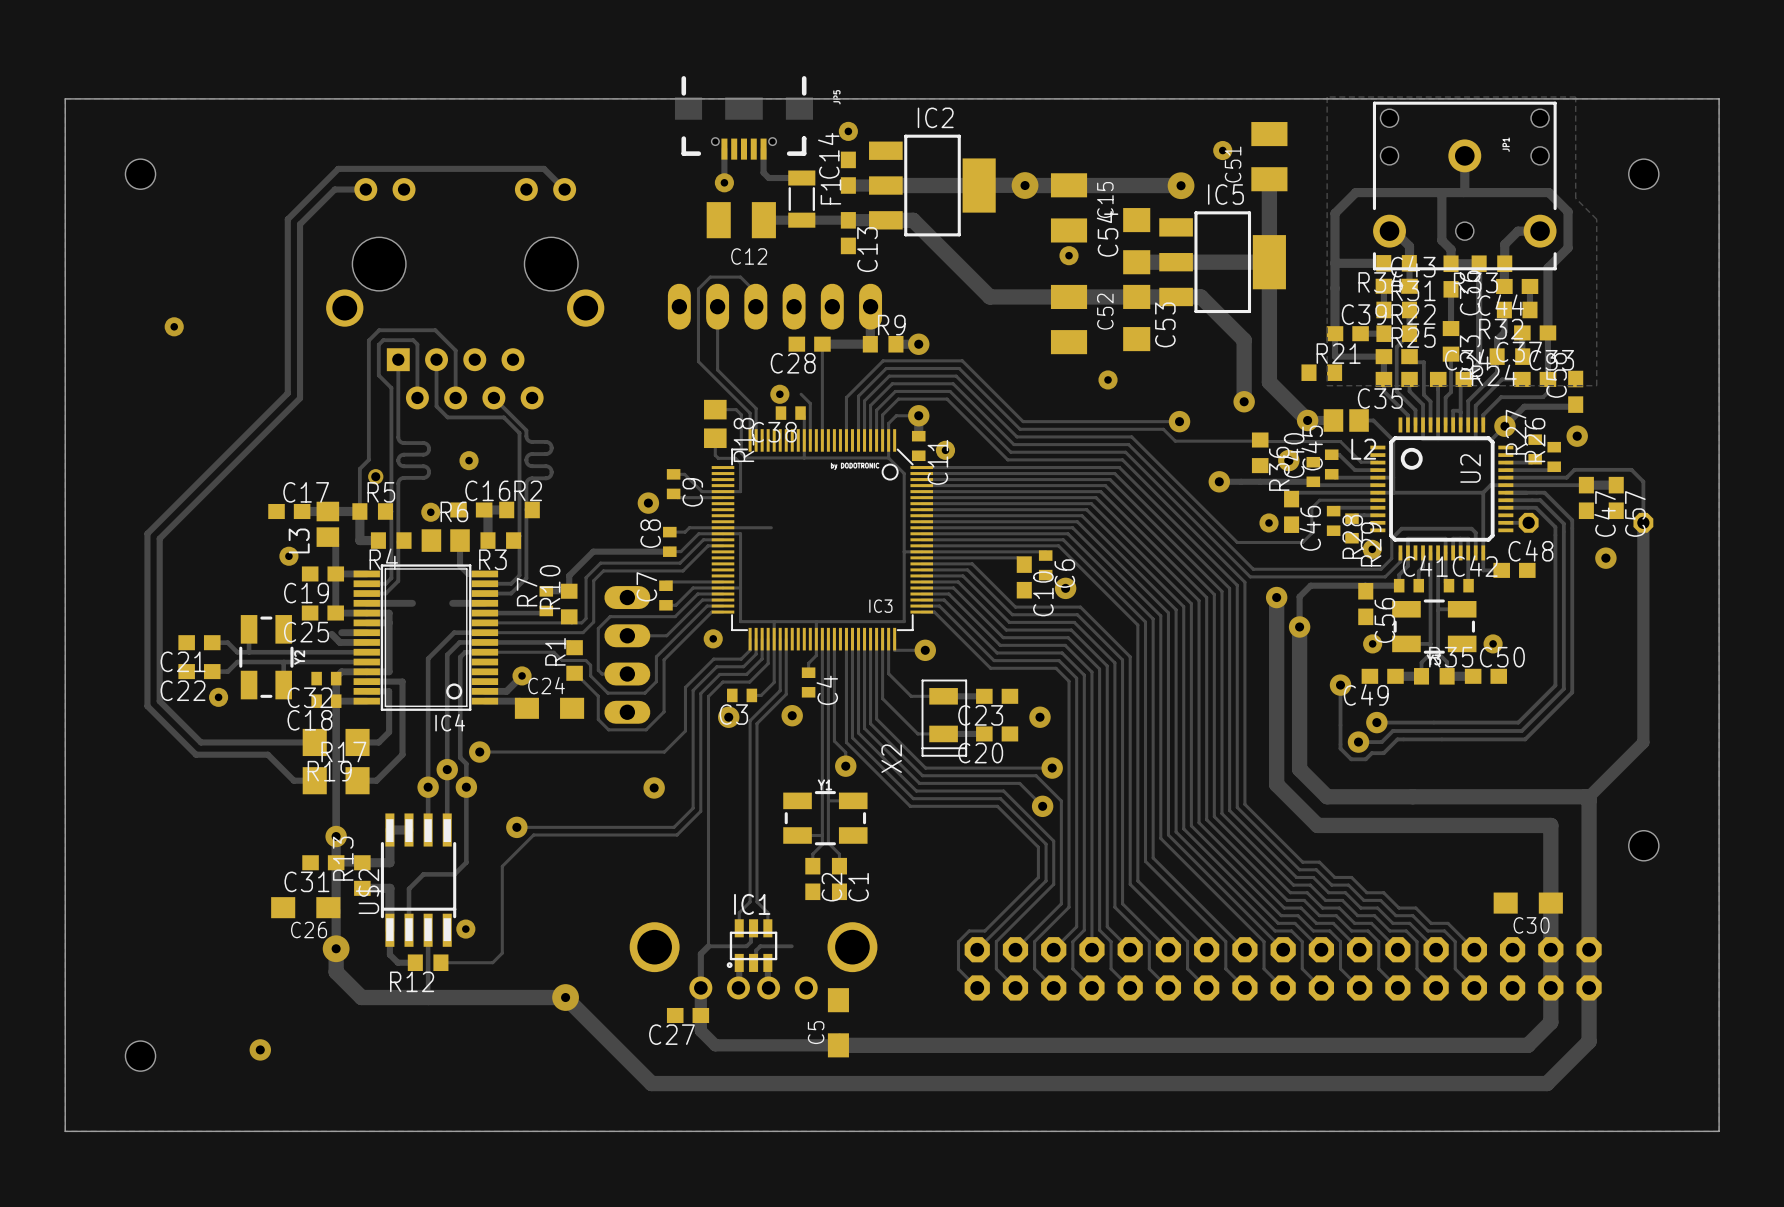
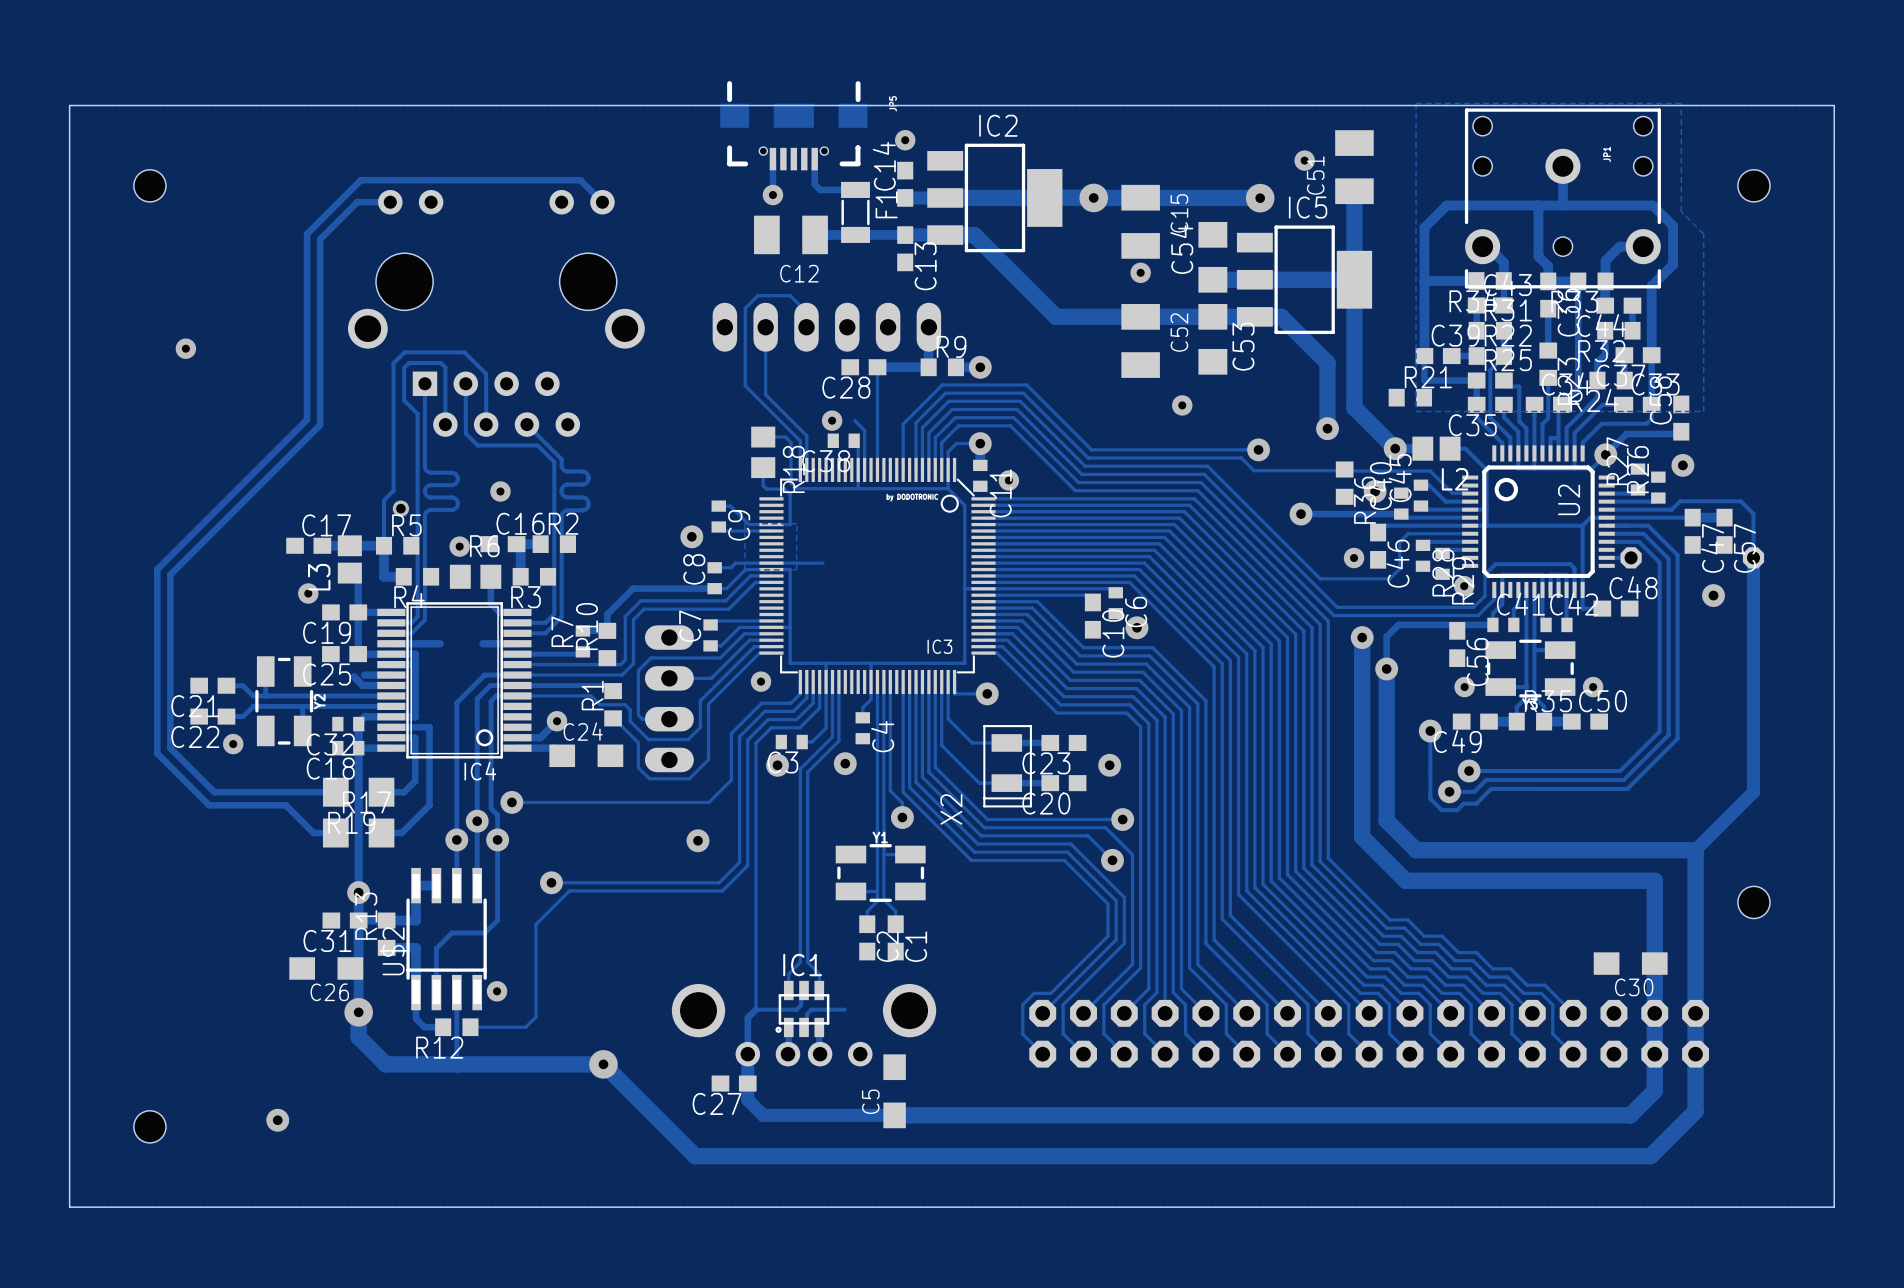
zone outline: none -> (744, 523) (744, 569) (796, 569) (796, 523) (744, 523)

